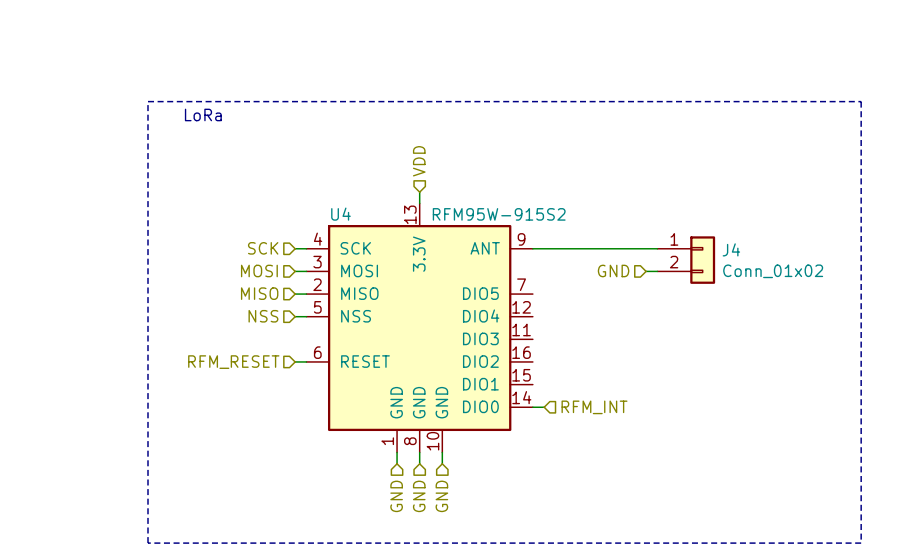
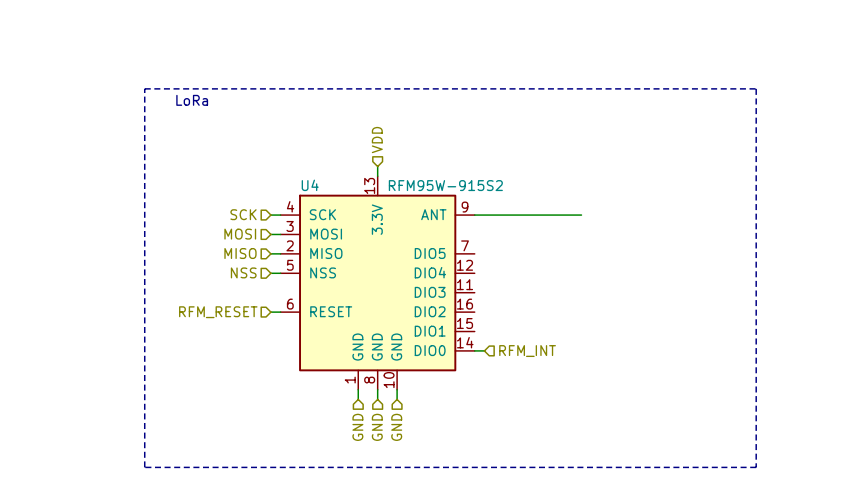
J4: Conn_01x02 (686, 260) -> none
hierarchical label: GND (613, 270) -> none
wire: (646, 271) (657, 271) -> none

